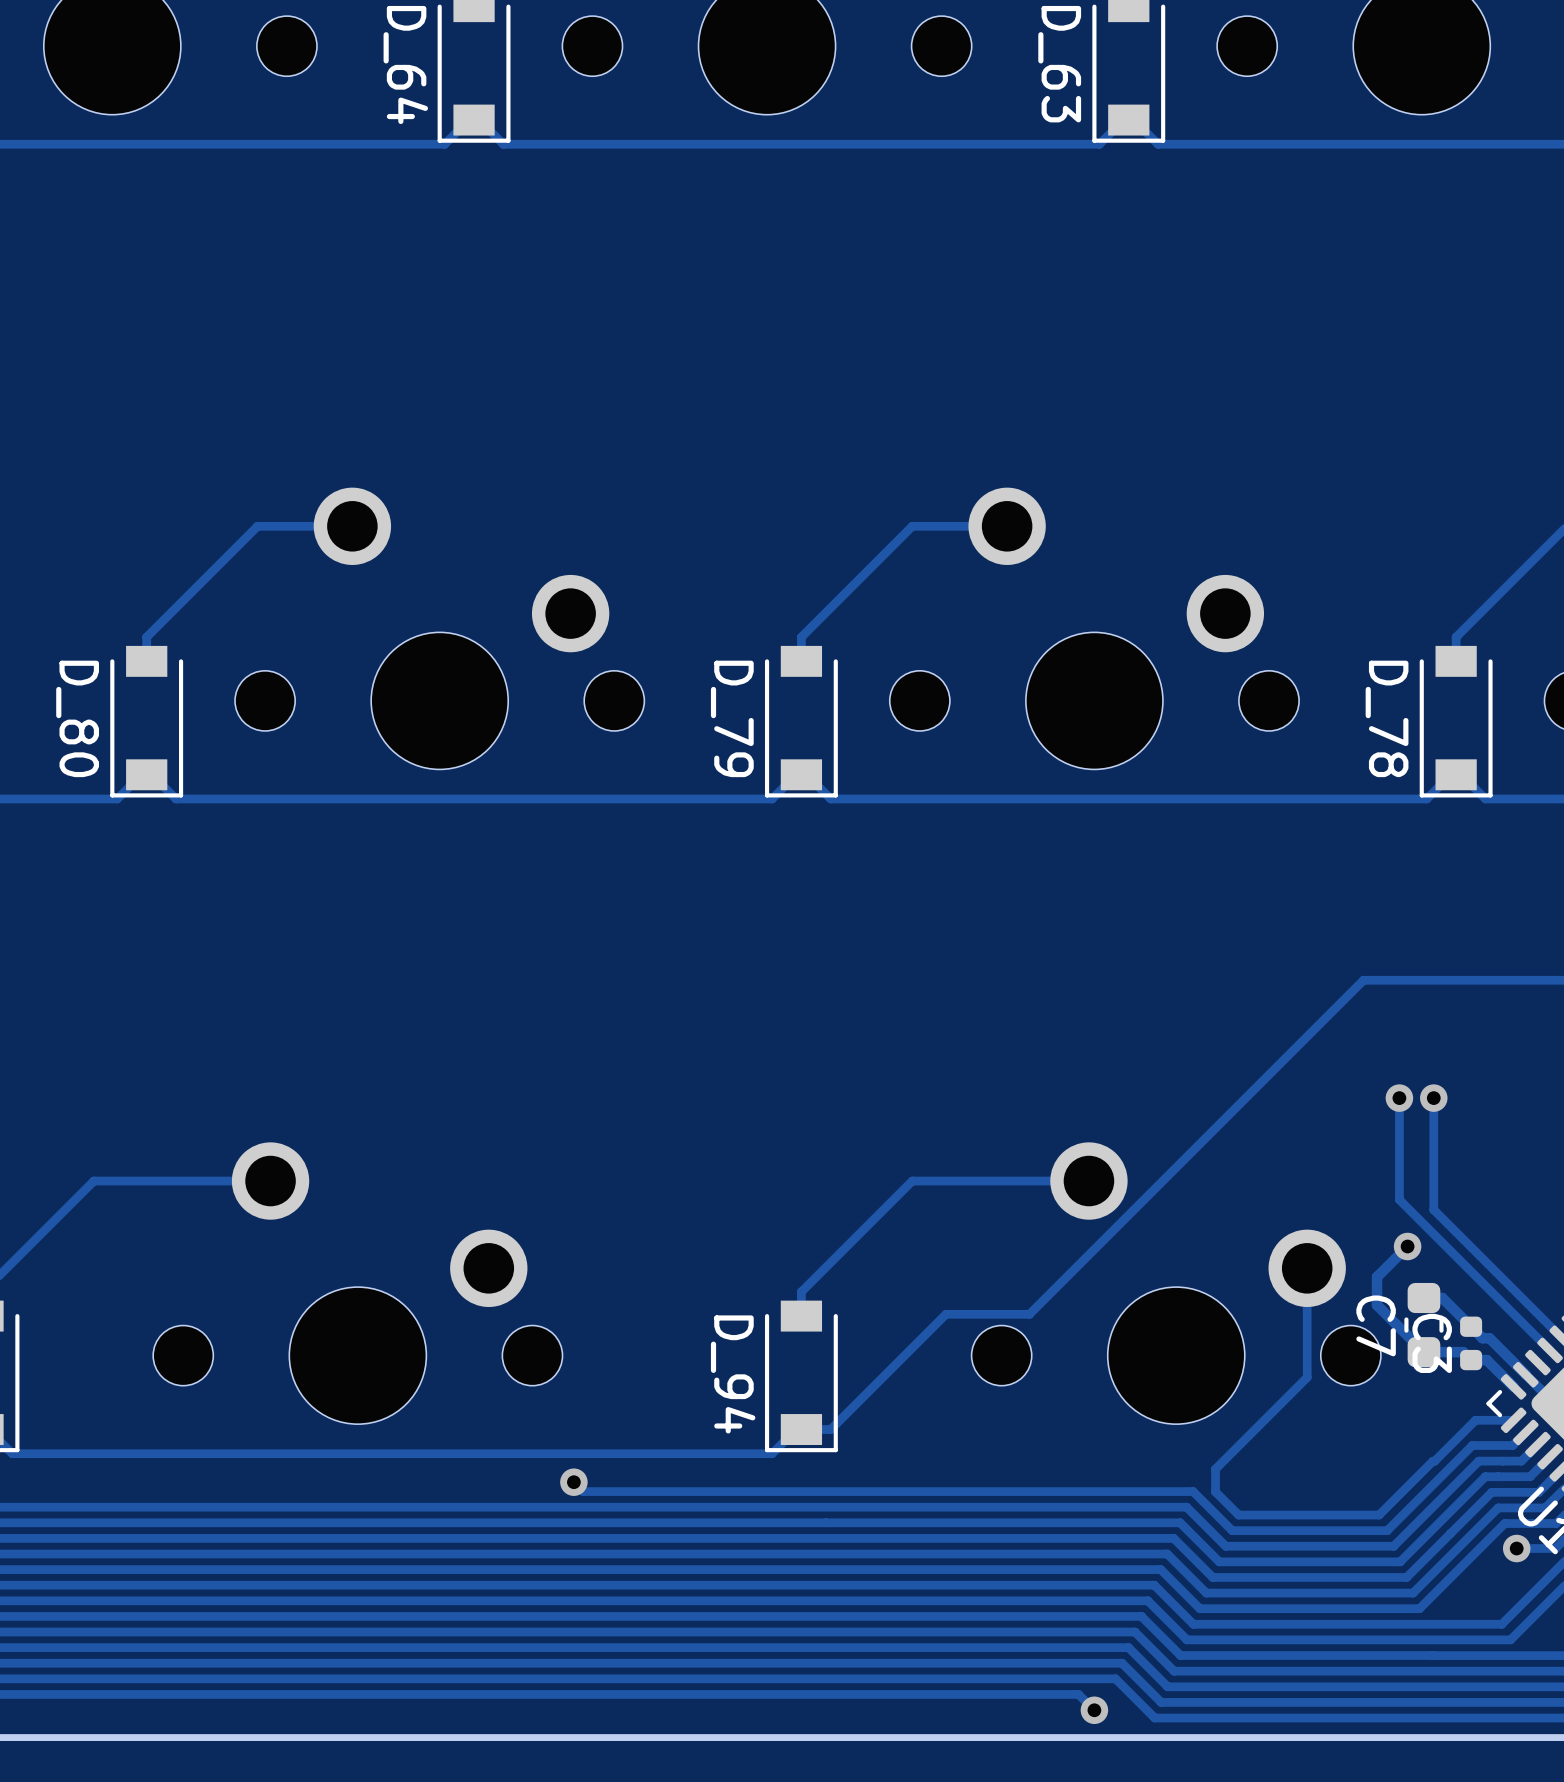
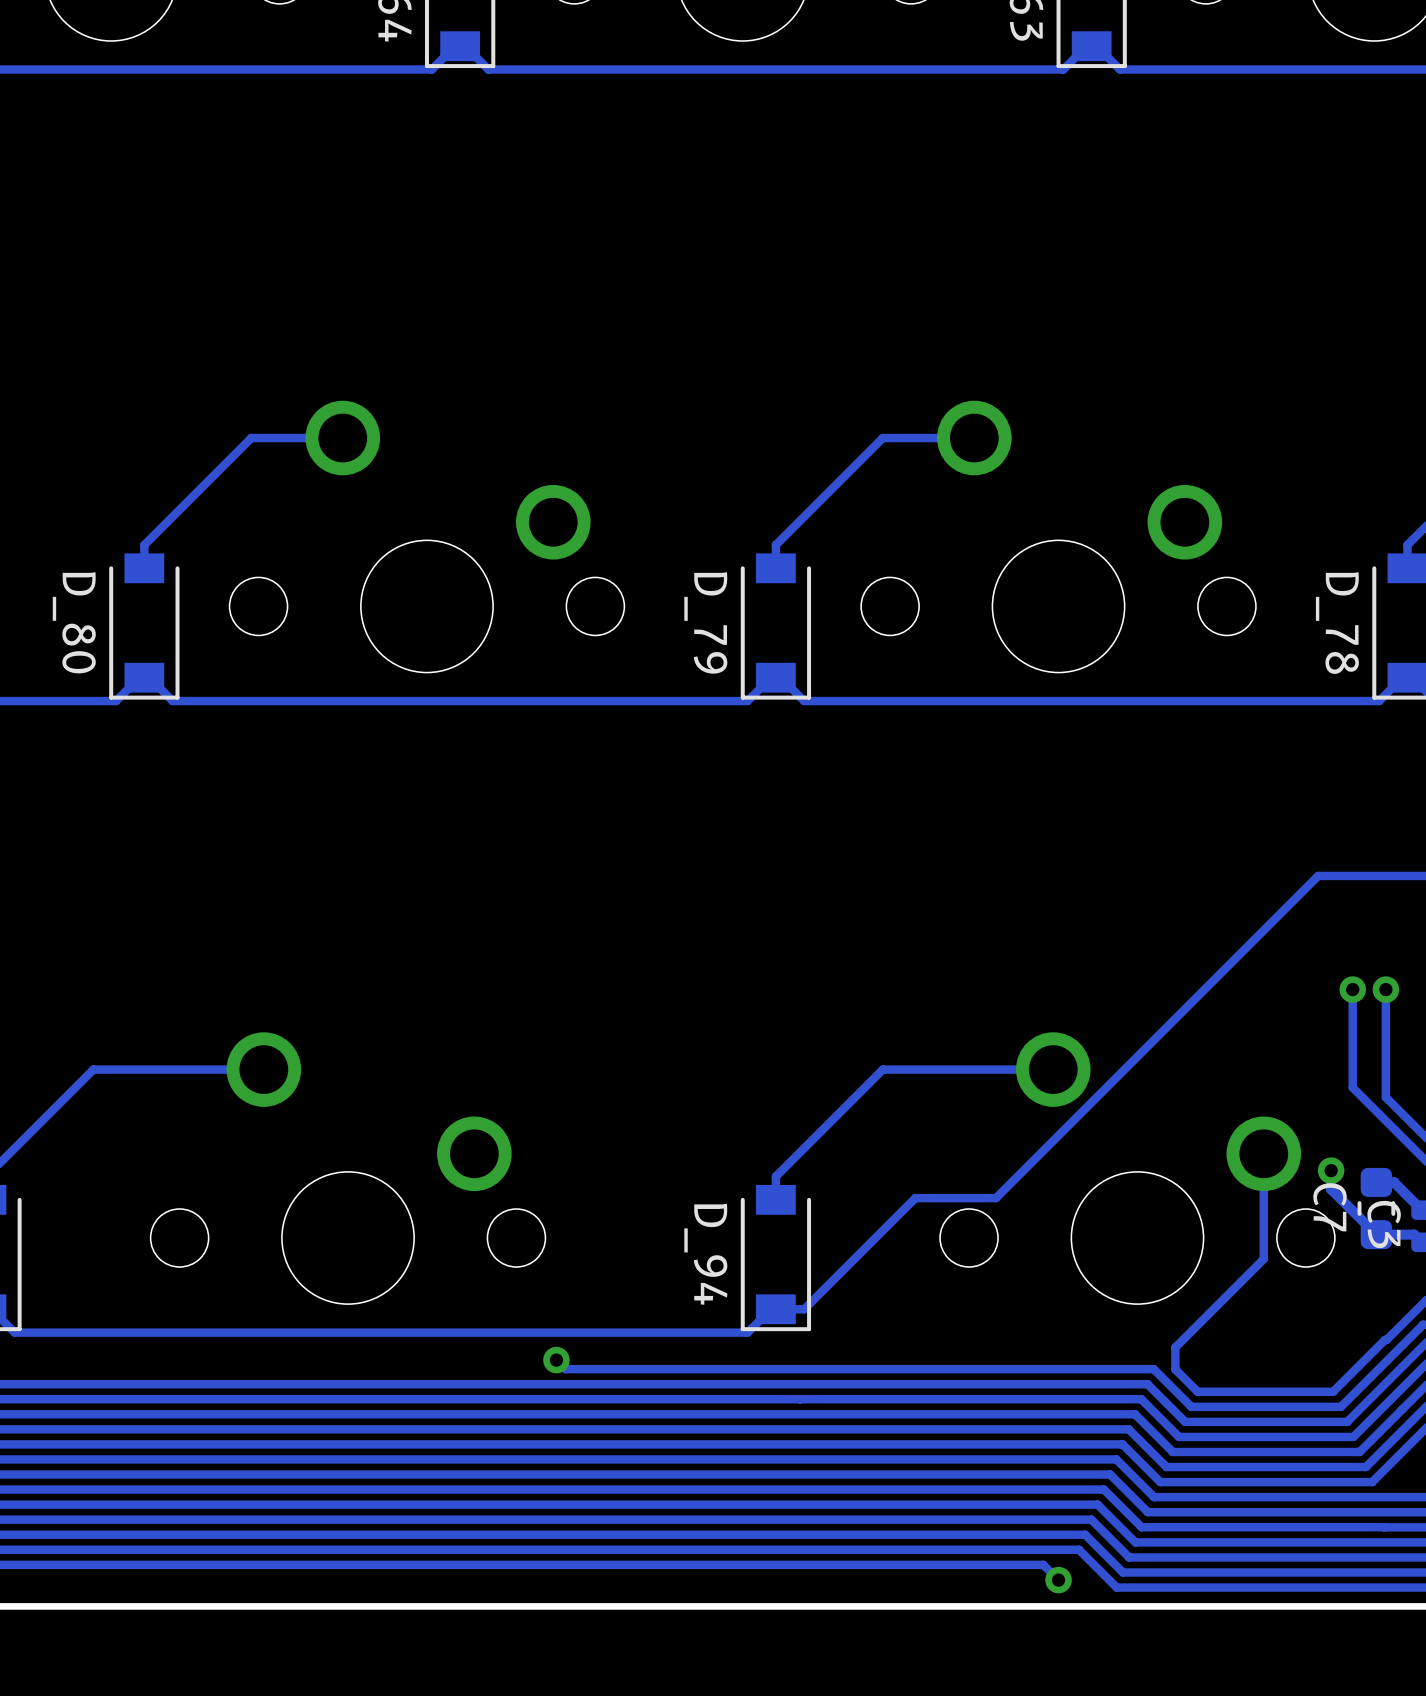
track: (1407, 1246) (1377, 1277) (1377, 1285) -> none
via position: (1407, 1246) -> (1331, 1170)

